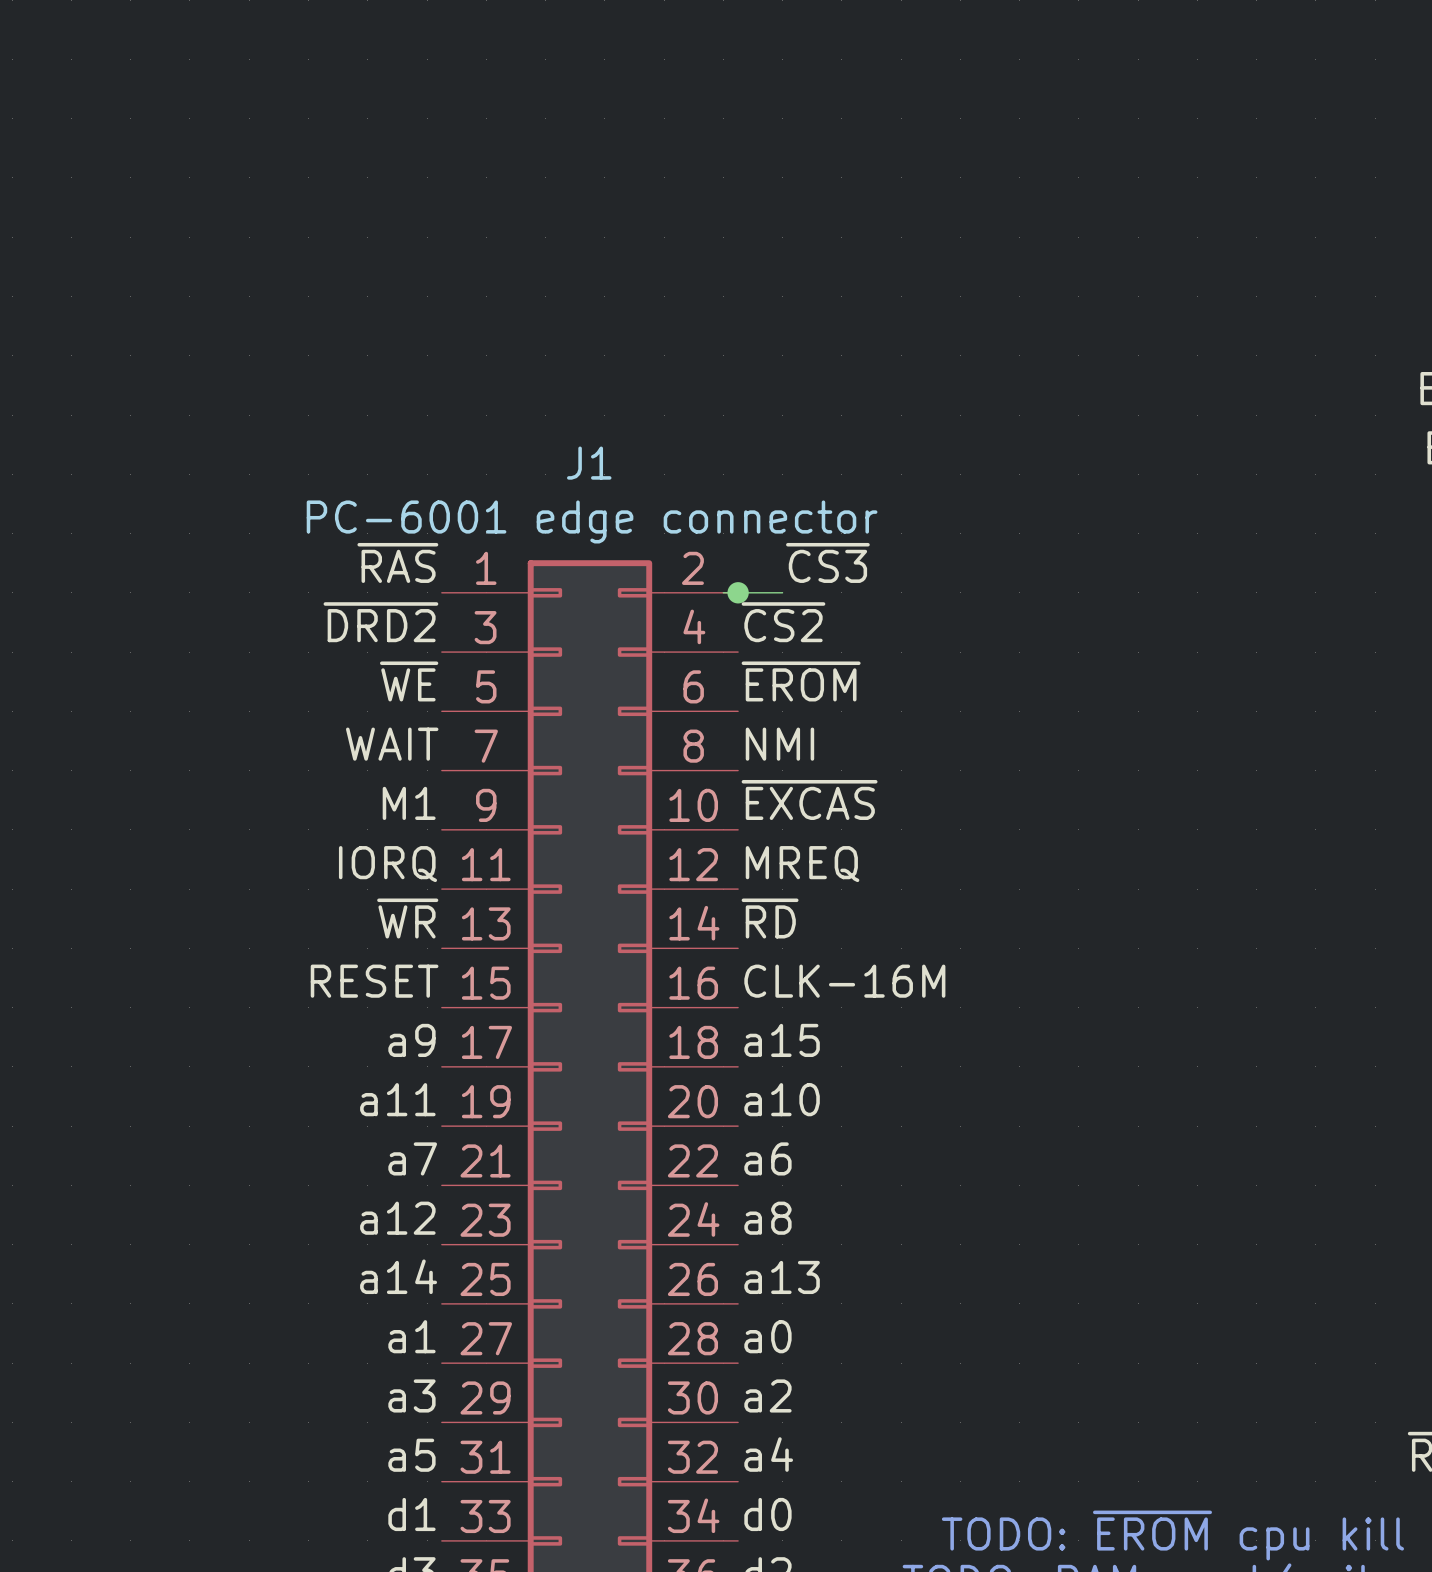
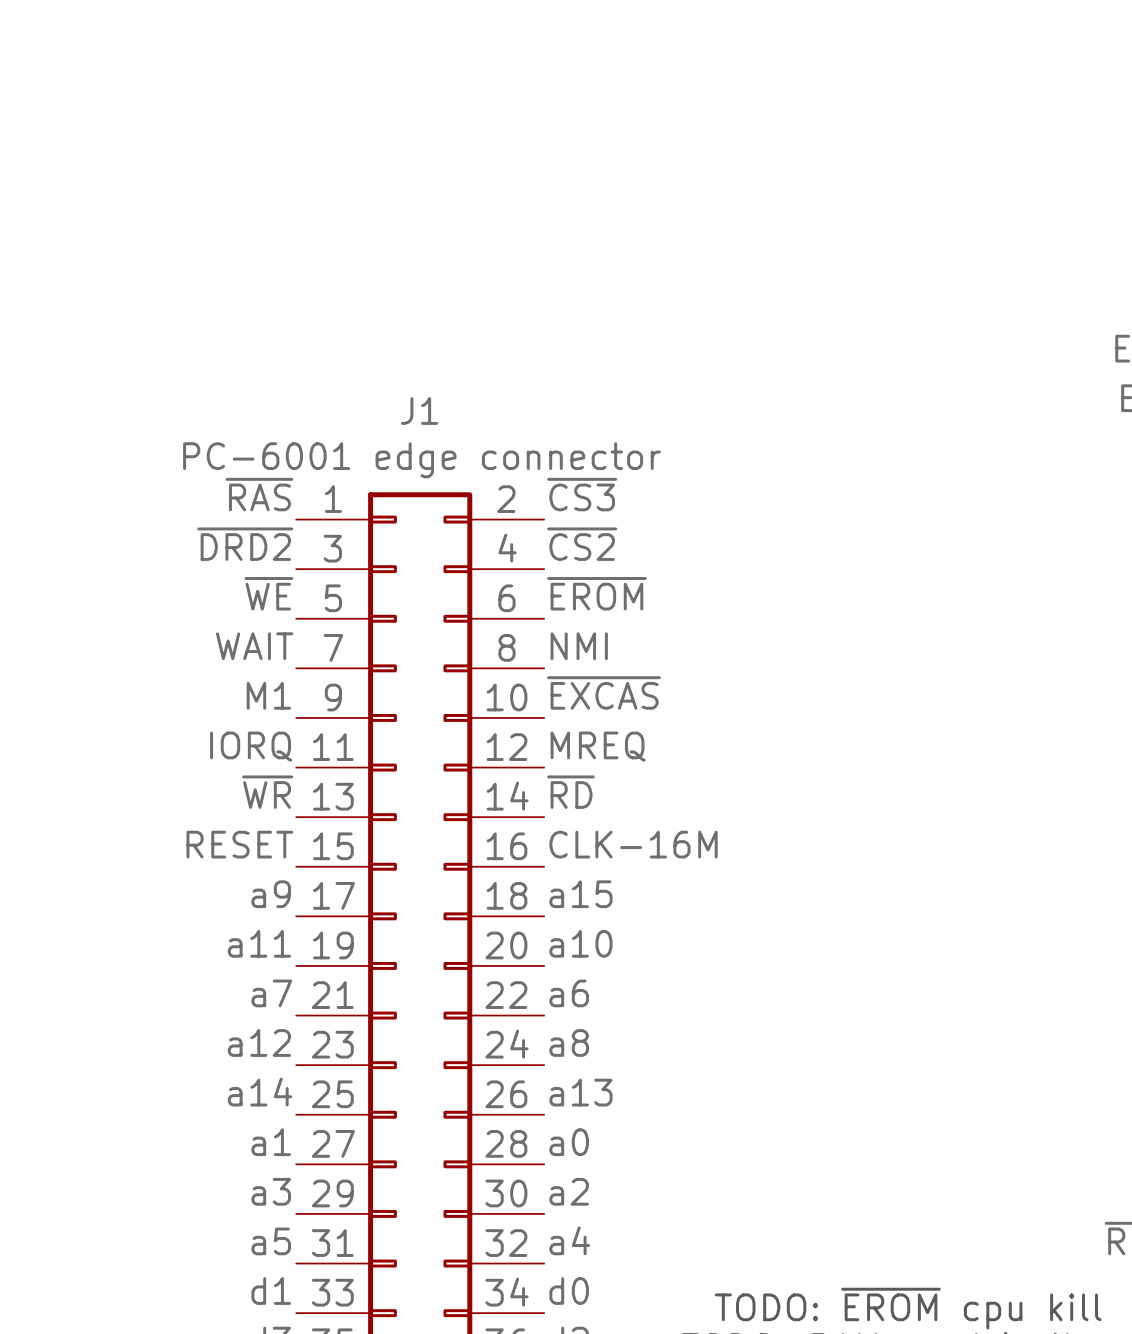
label position: ~{CS3} (827, 562) -> ~{CS3} (582, 494)
wire: (723, 592) (782, 592) -> none
junction: (738, 592) -> none

